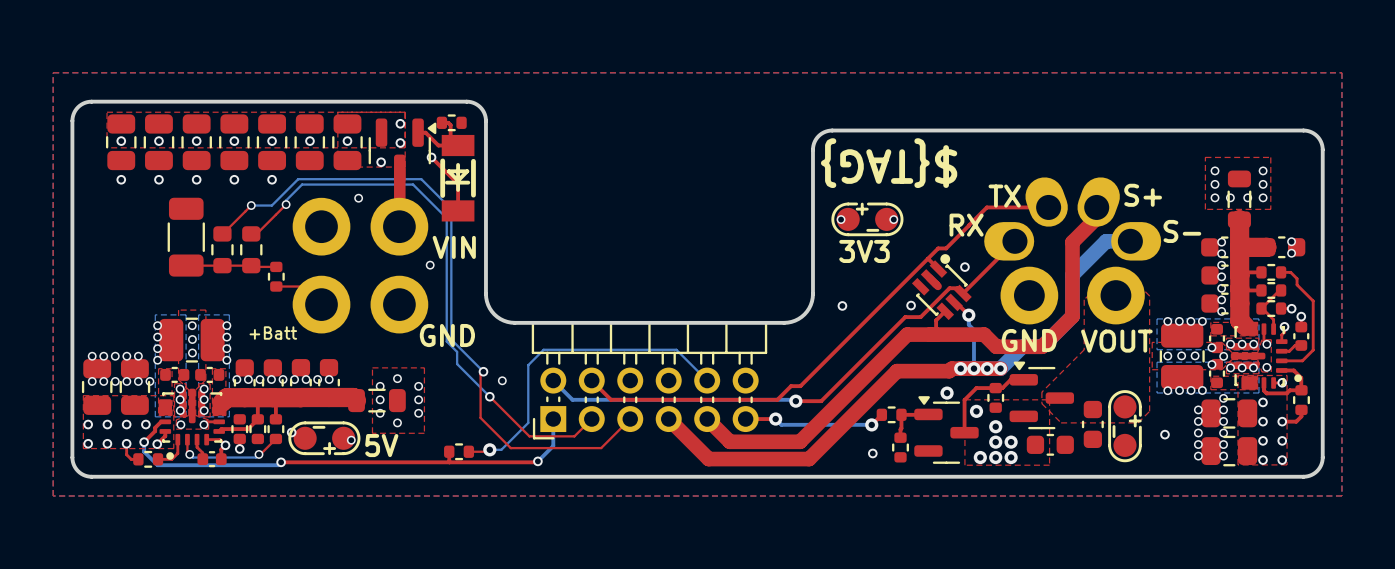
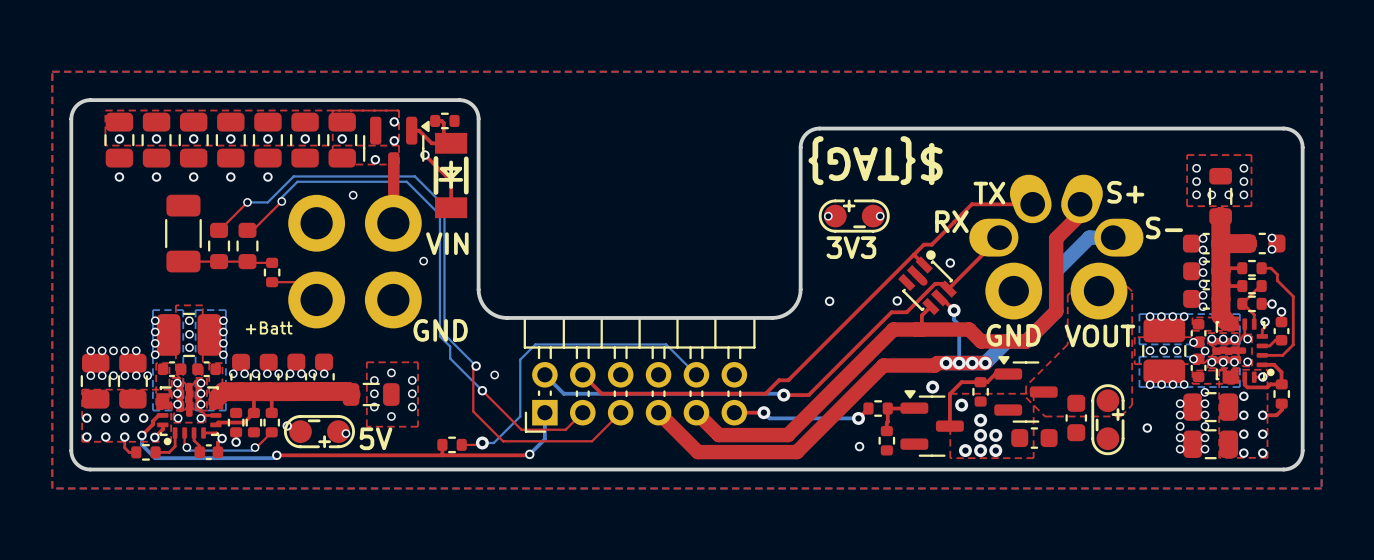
part footprint: [1230, 322, 1302, 390] -> [1212, 317, 1275, 384]
part footprint: [158, 388, 226, 460] -> [156, 382, 223, 446]

